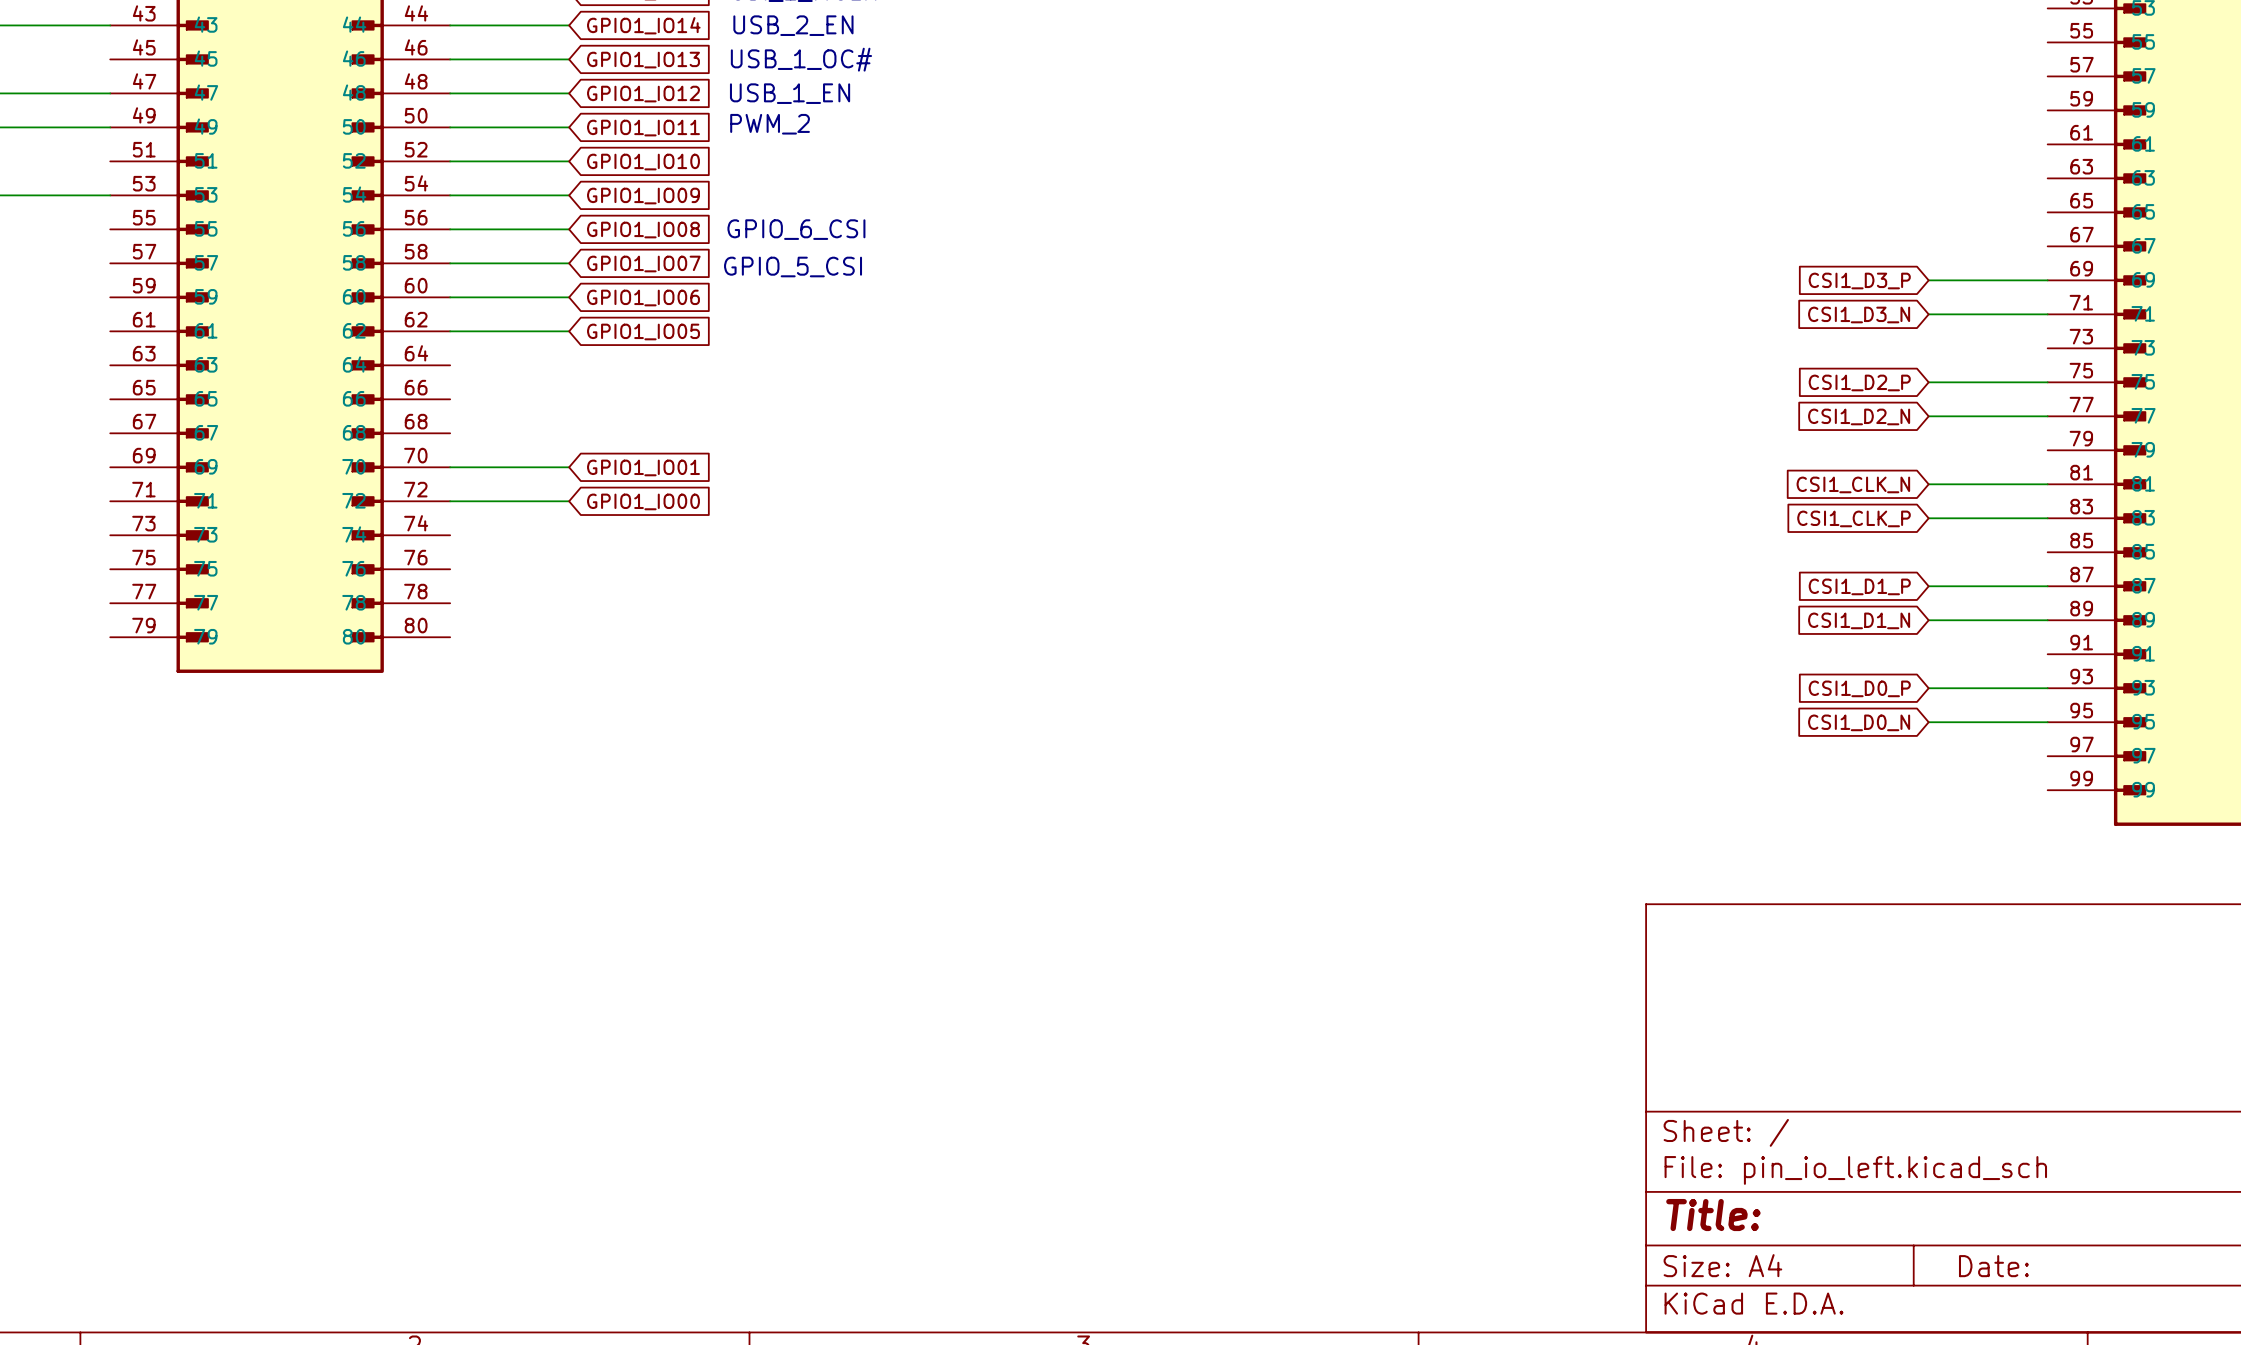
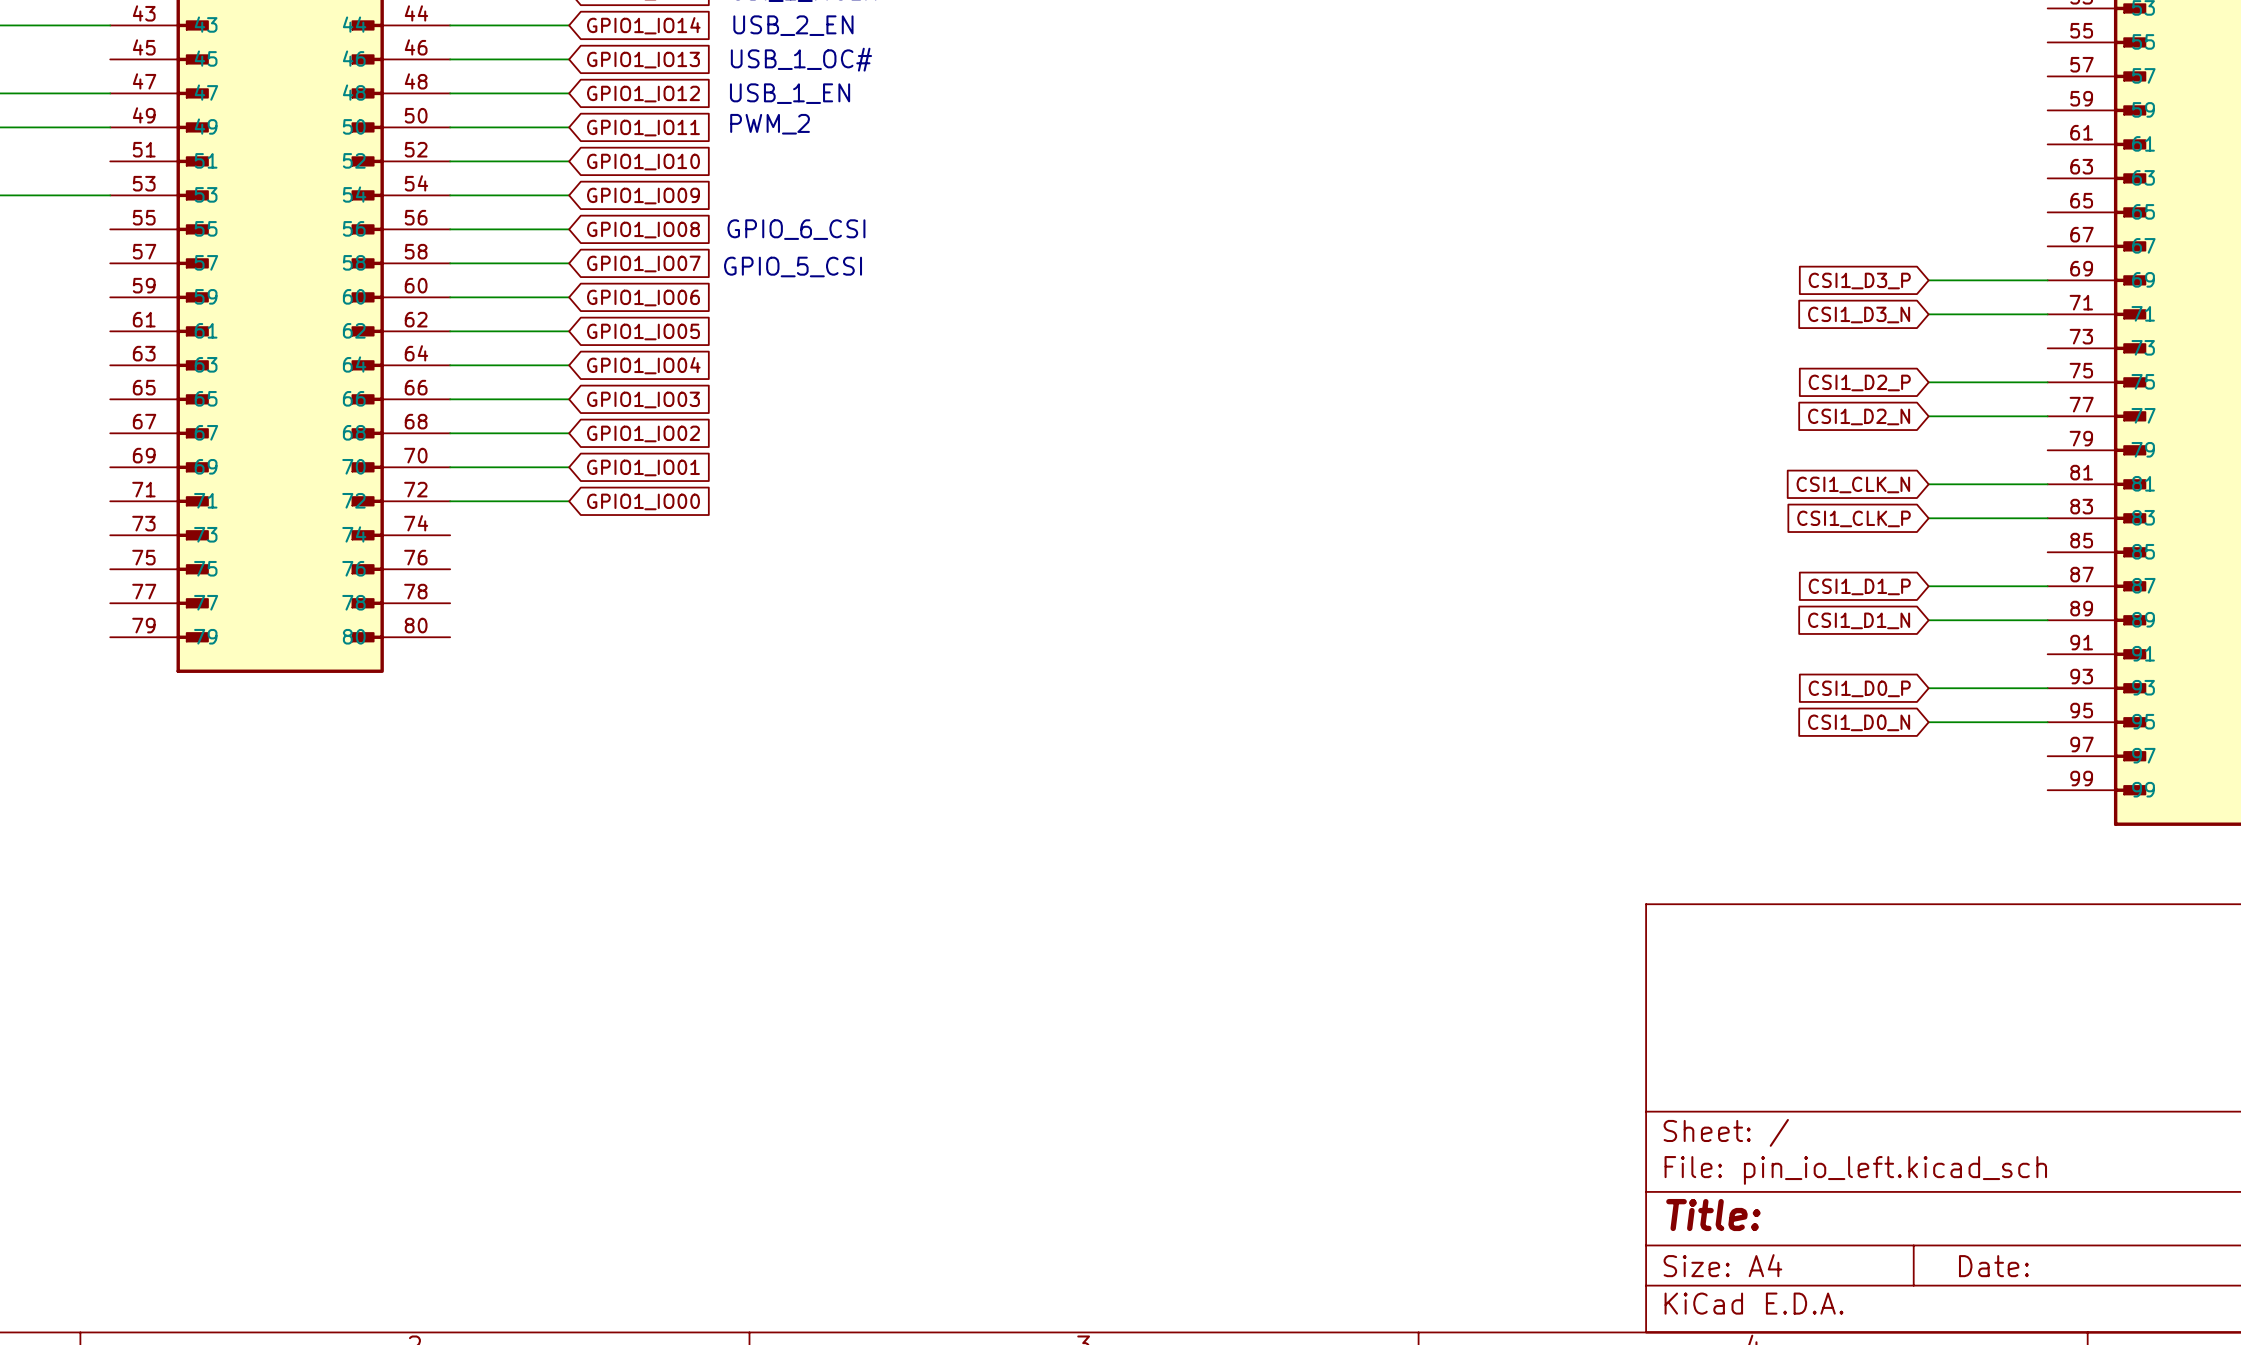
wire: none -> (450, 365) (569, 365)
global label: none -> GPIO1_IO04 (643, 365)
wire: none -> (450, 399) (569, 399)
global label: none -> GPIO1_IO03 (643, 399)
wire: none -> (450, 433) (569, 433)
global label: none -> GPIO1_IO02 (643, 433)

